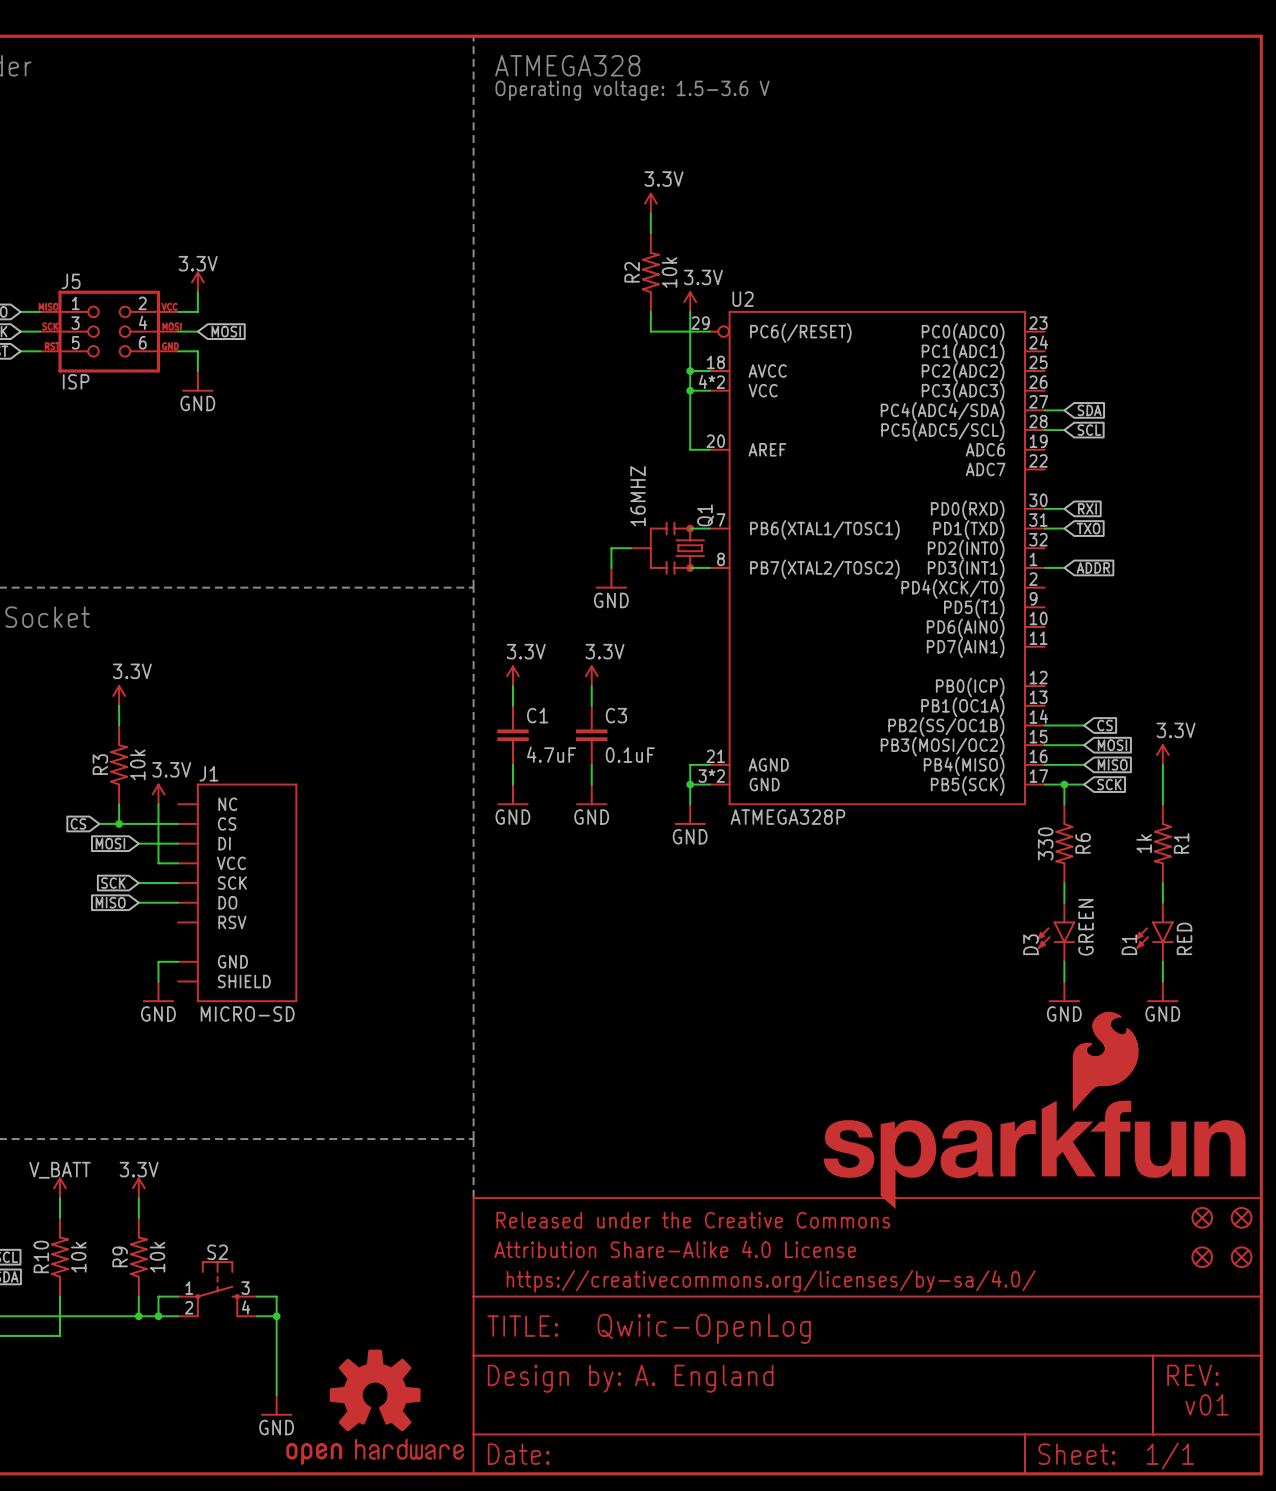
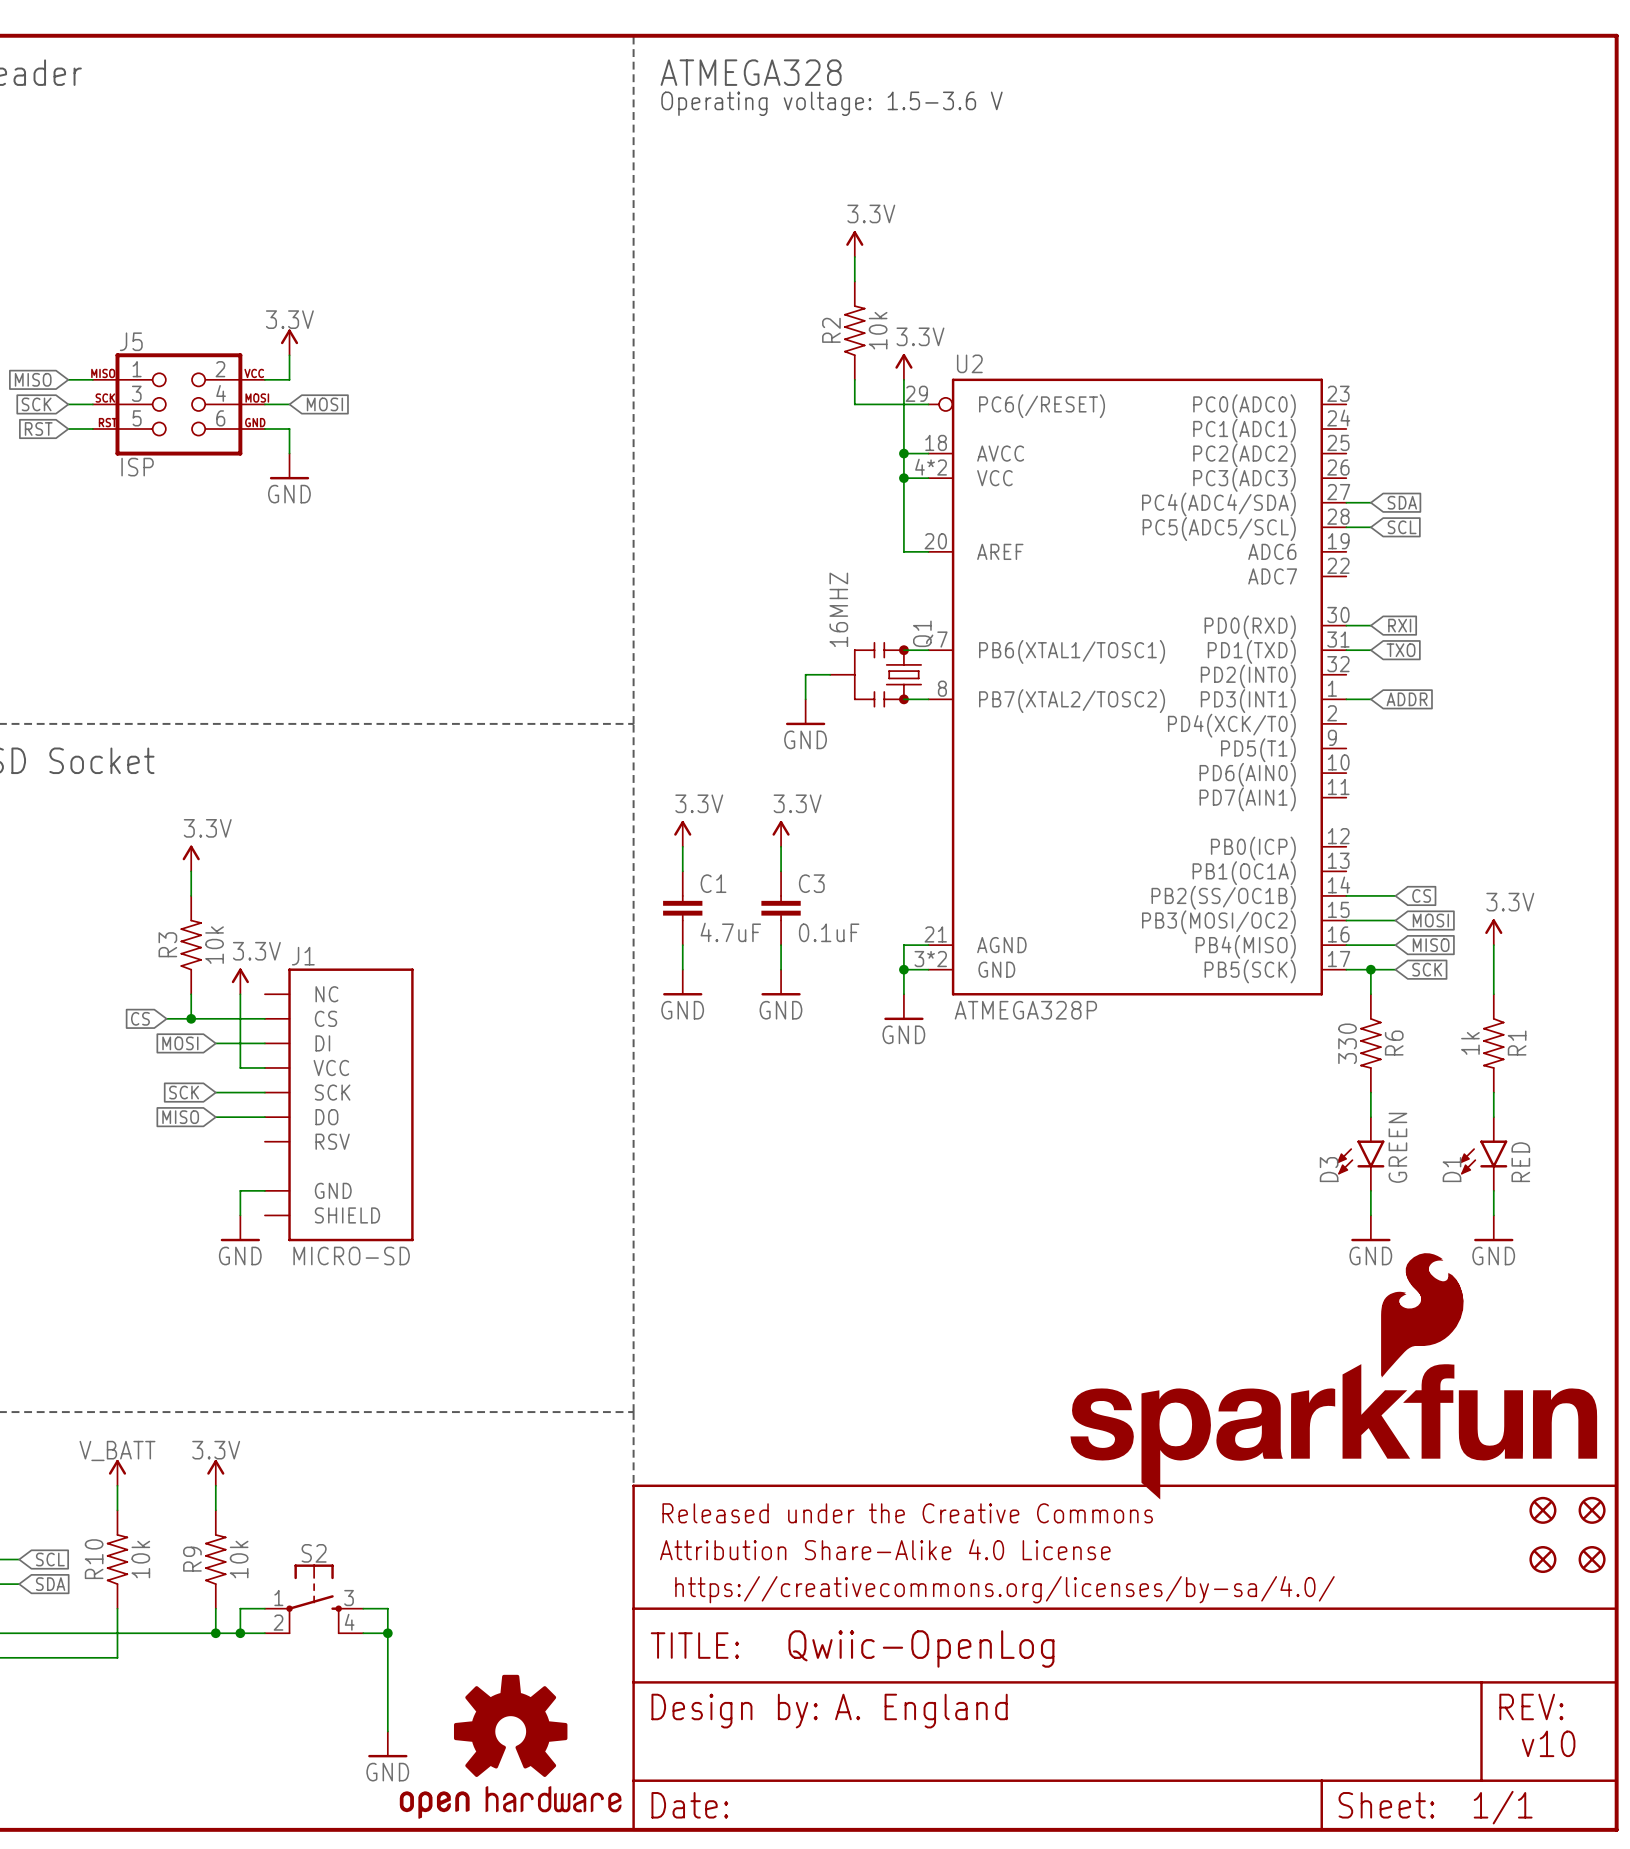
text: v01 (1206, 1404) -> v10 (1548, 1743)

